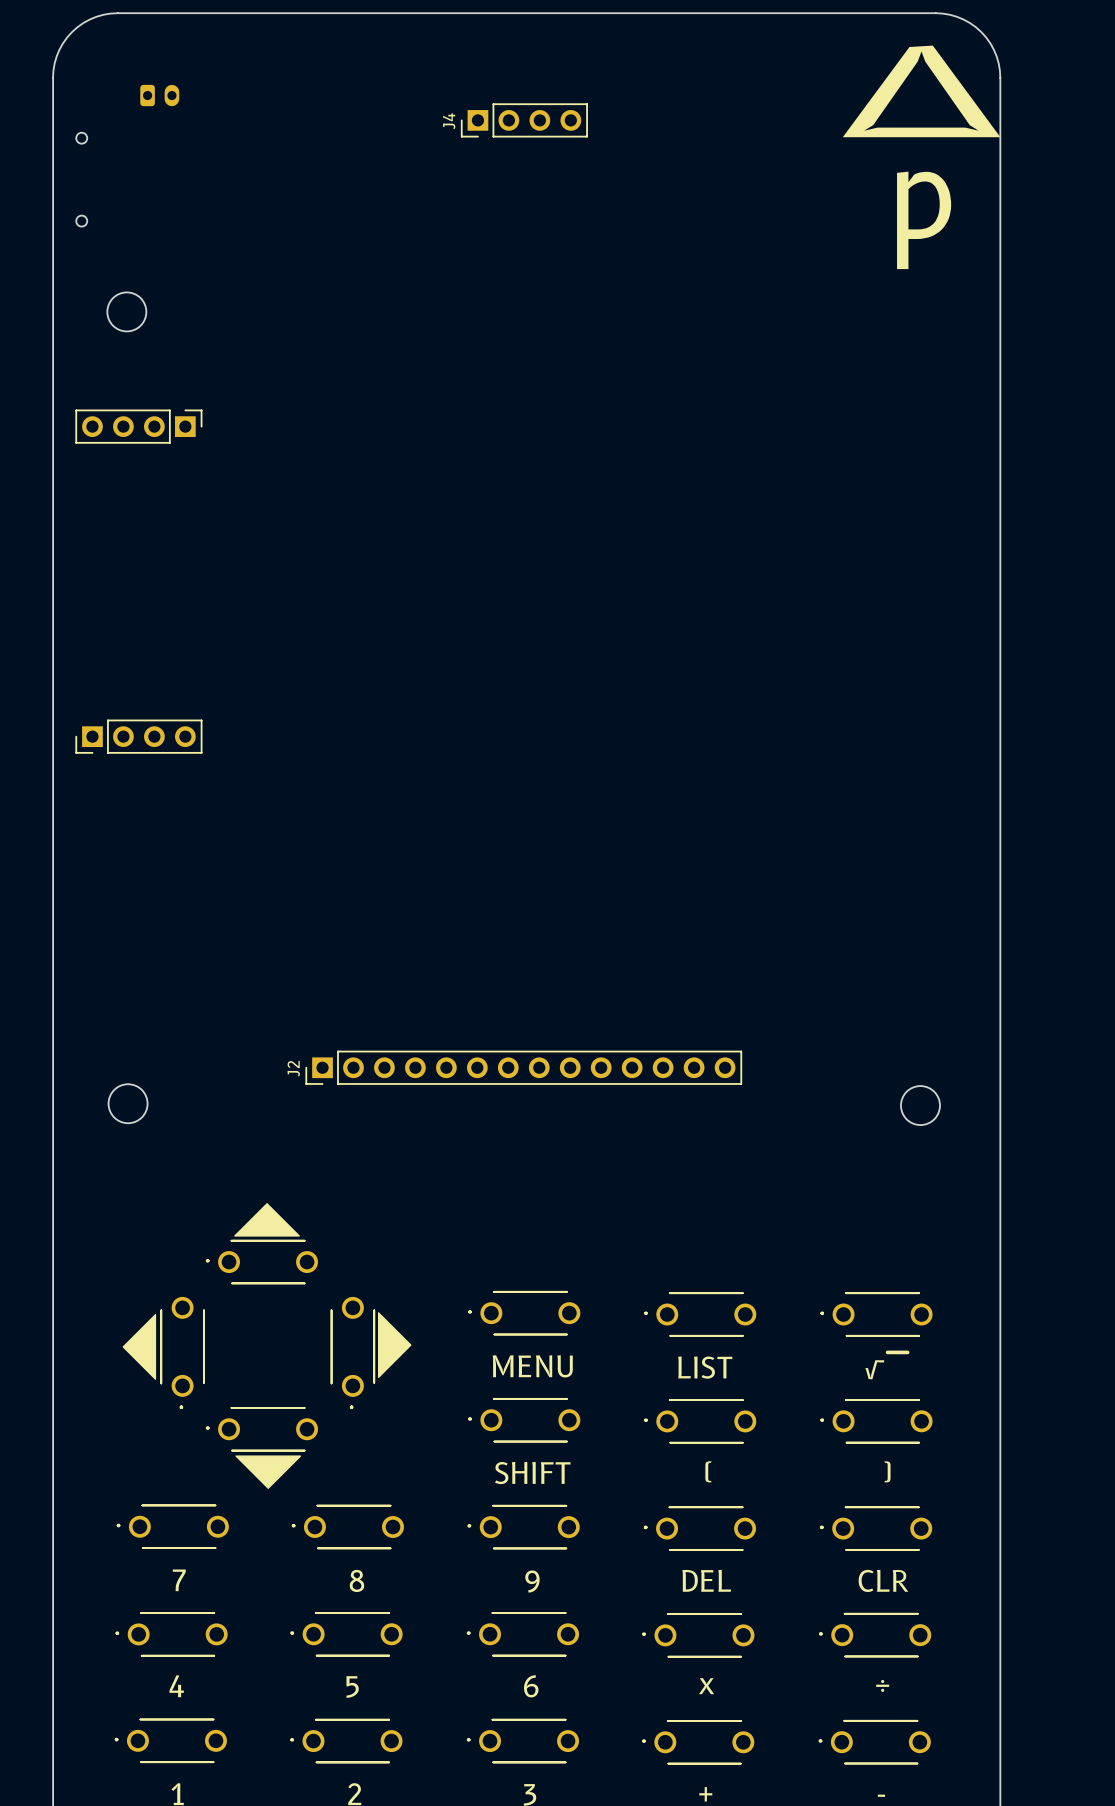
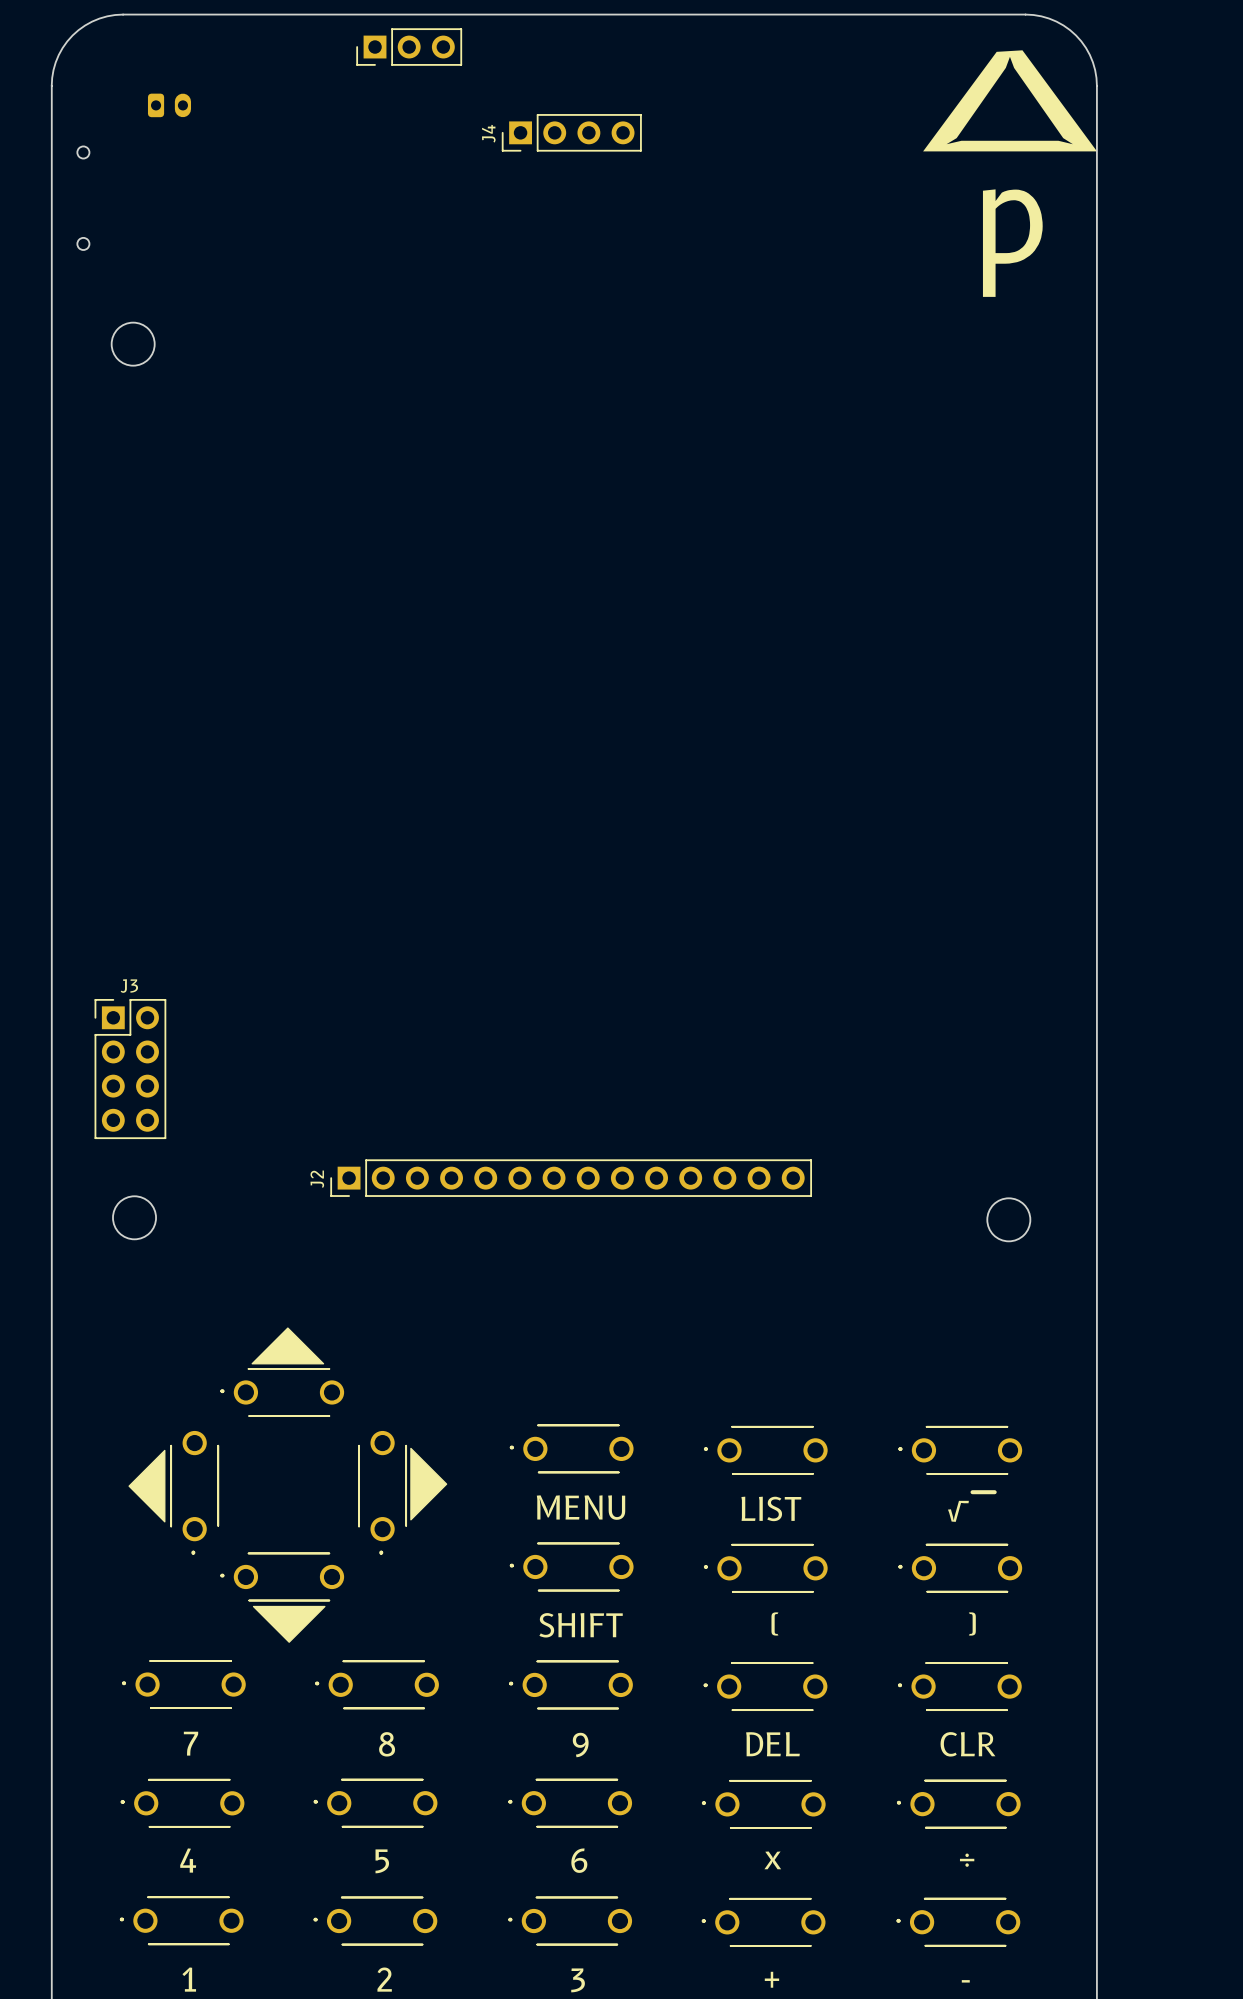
part: none -> (409, 47)
part: (138, 426) -> none
part: (138, 736) -> none
J3: none -> (130, 1069)

